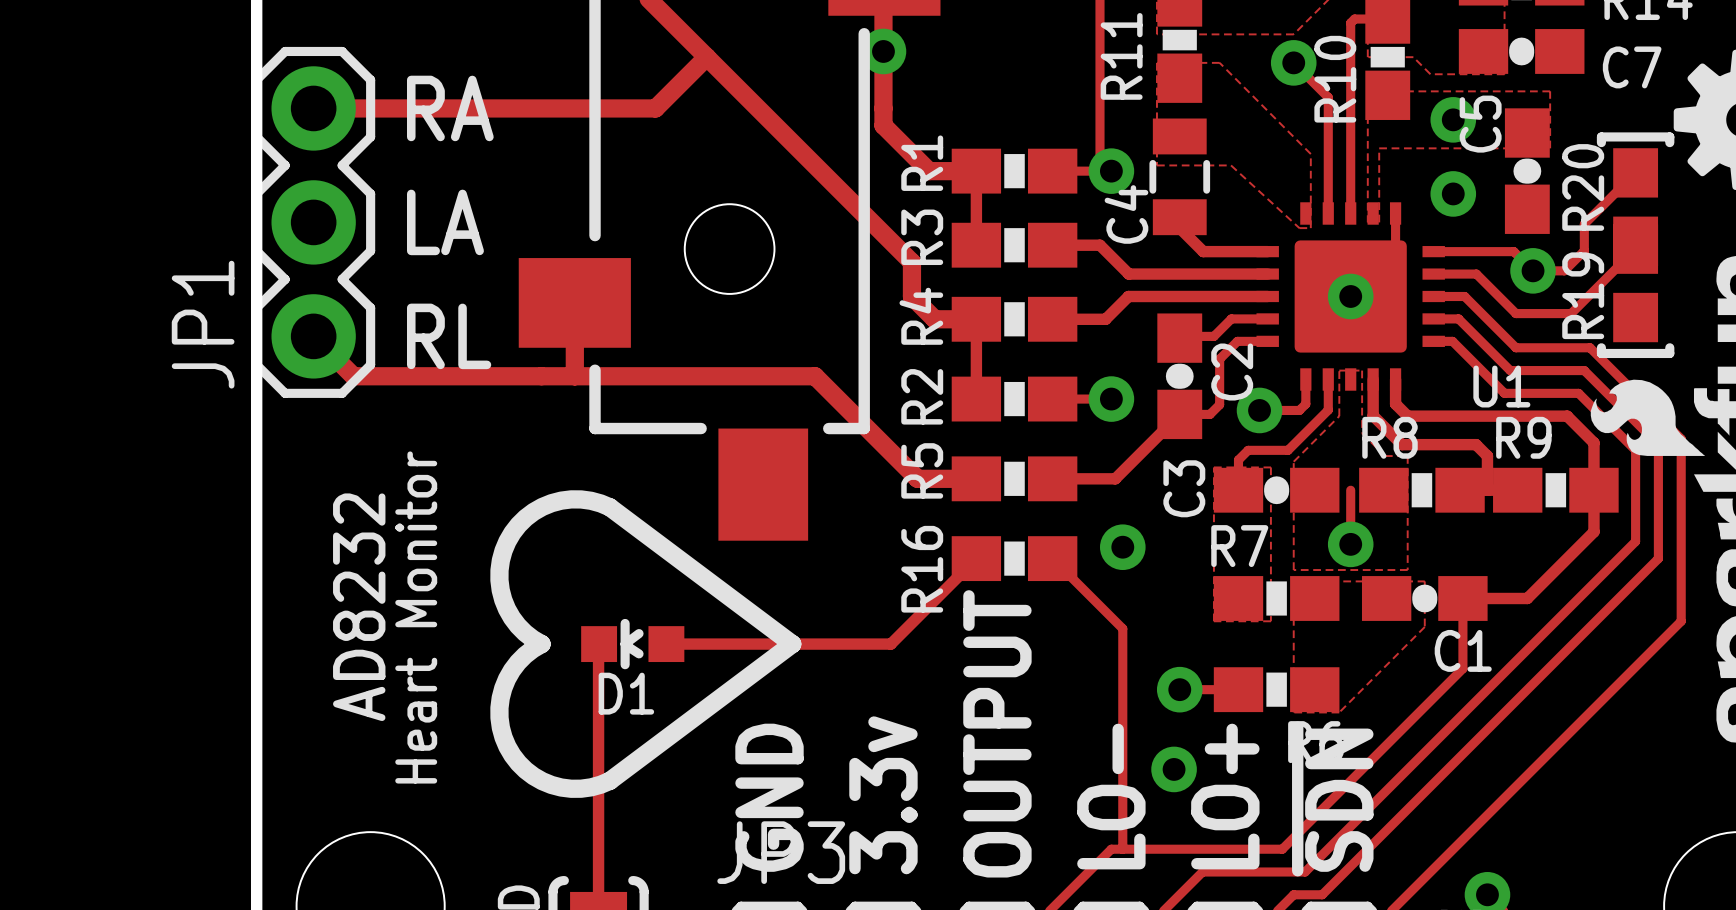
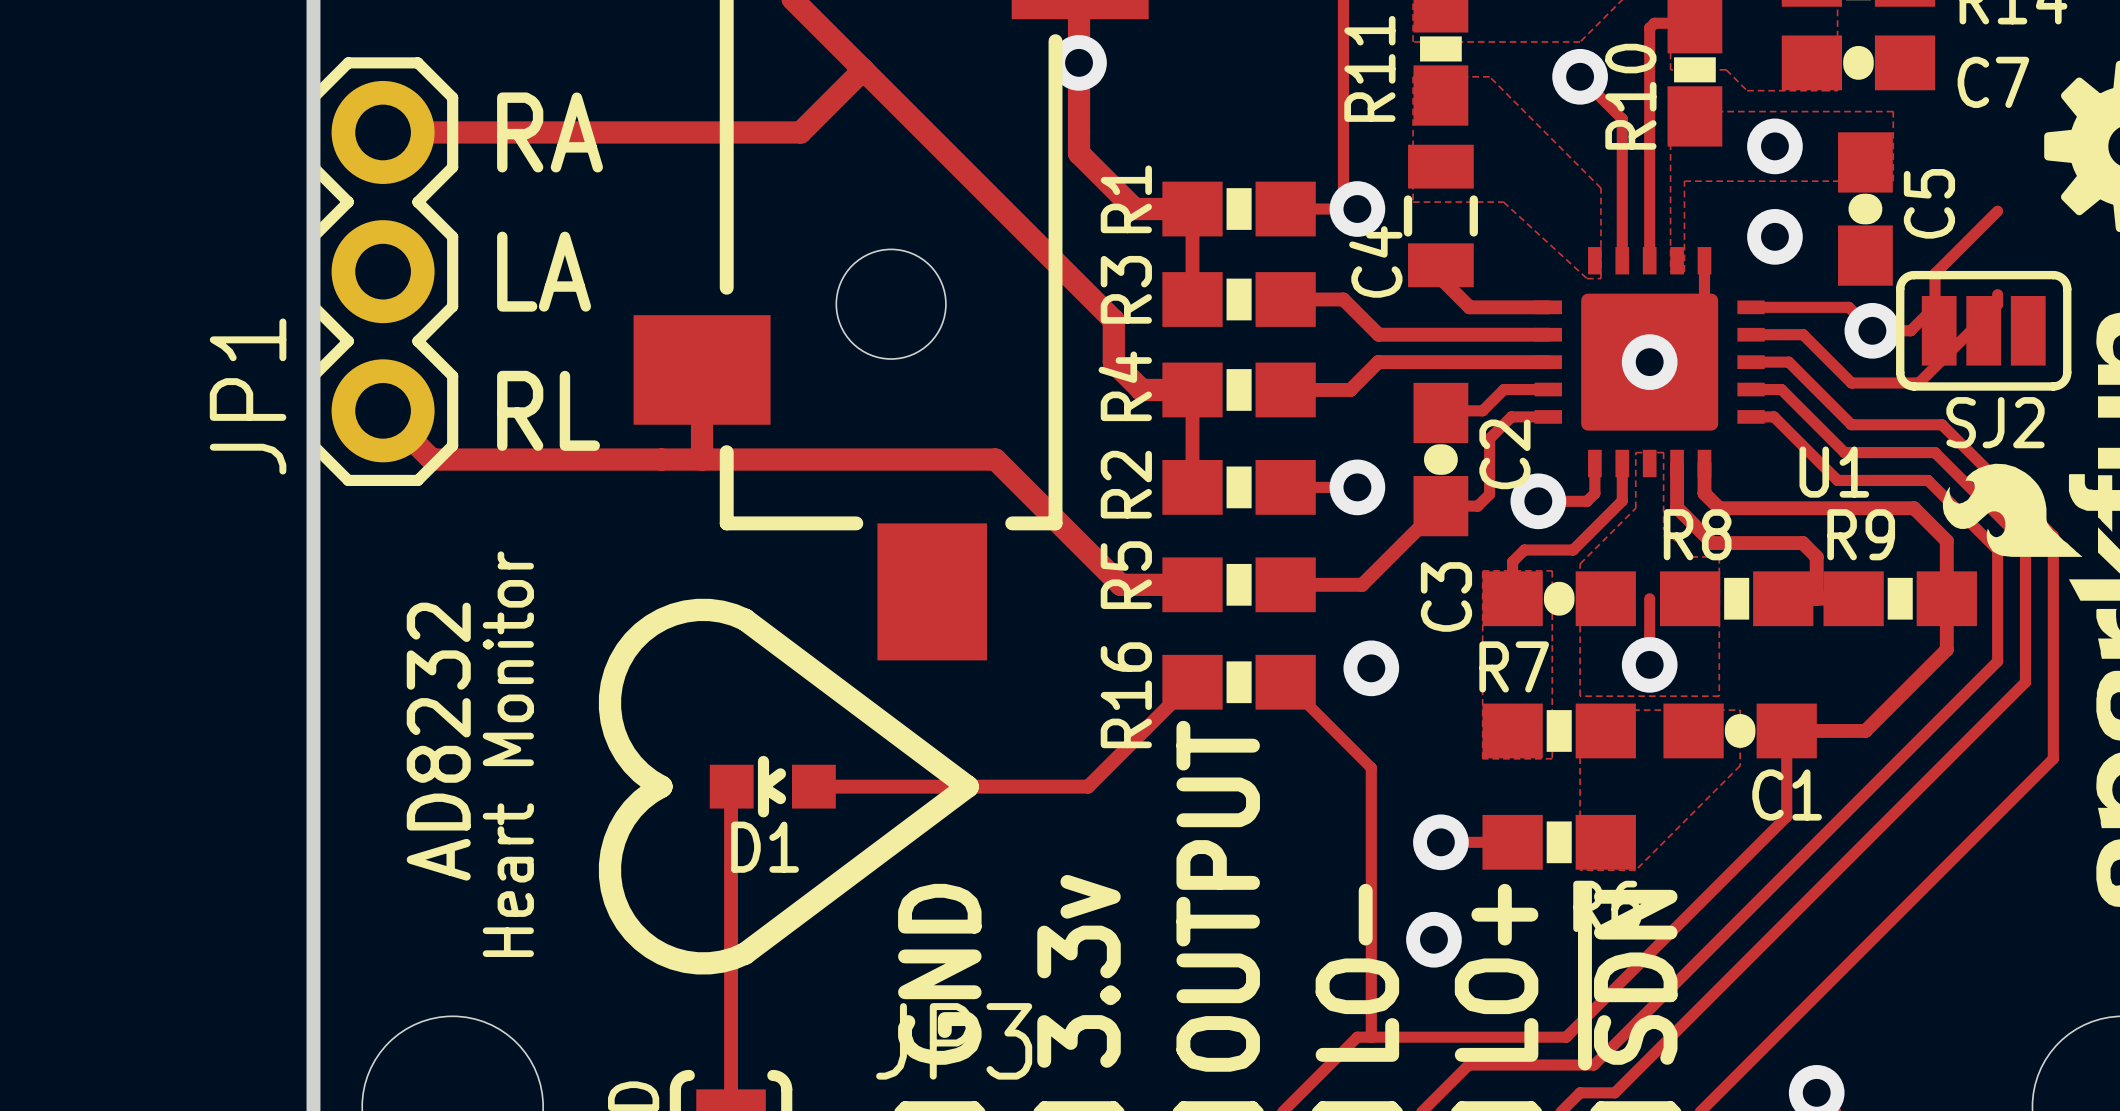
C5 name position: C5 (1480, 124) -> C5 (1929, 203)
line: (1601, 142) (1601, 136) (1669, 136) (1669, 142) -> none
R20: (1635, 211) -> none
SJ2: none -> (1983, 330)
R19: (1635, 279) -> none
line: (1601, 347) (1601, 353) (1669, 353) (1669, 347) -> none

